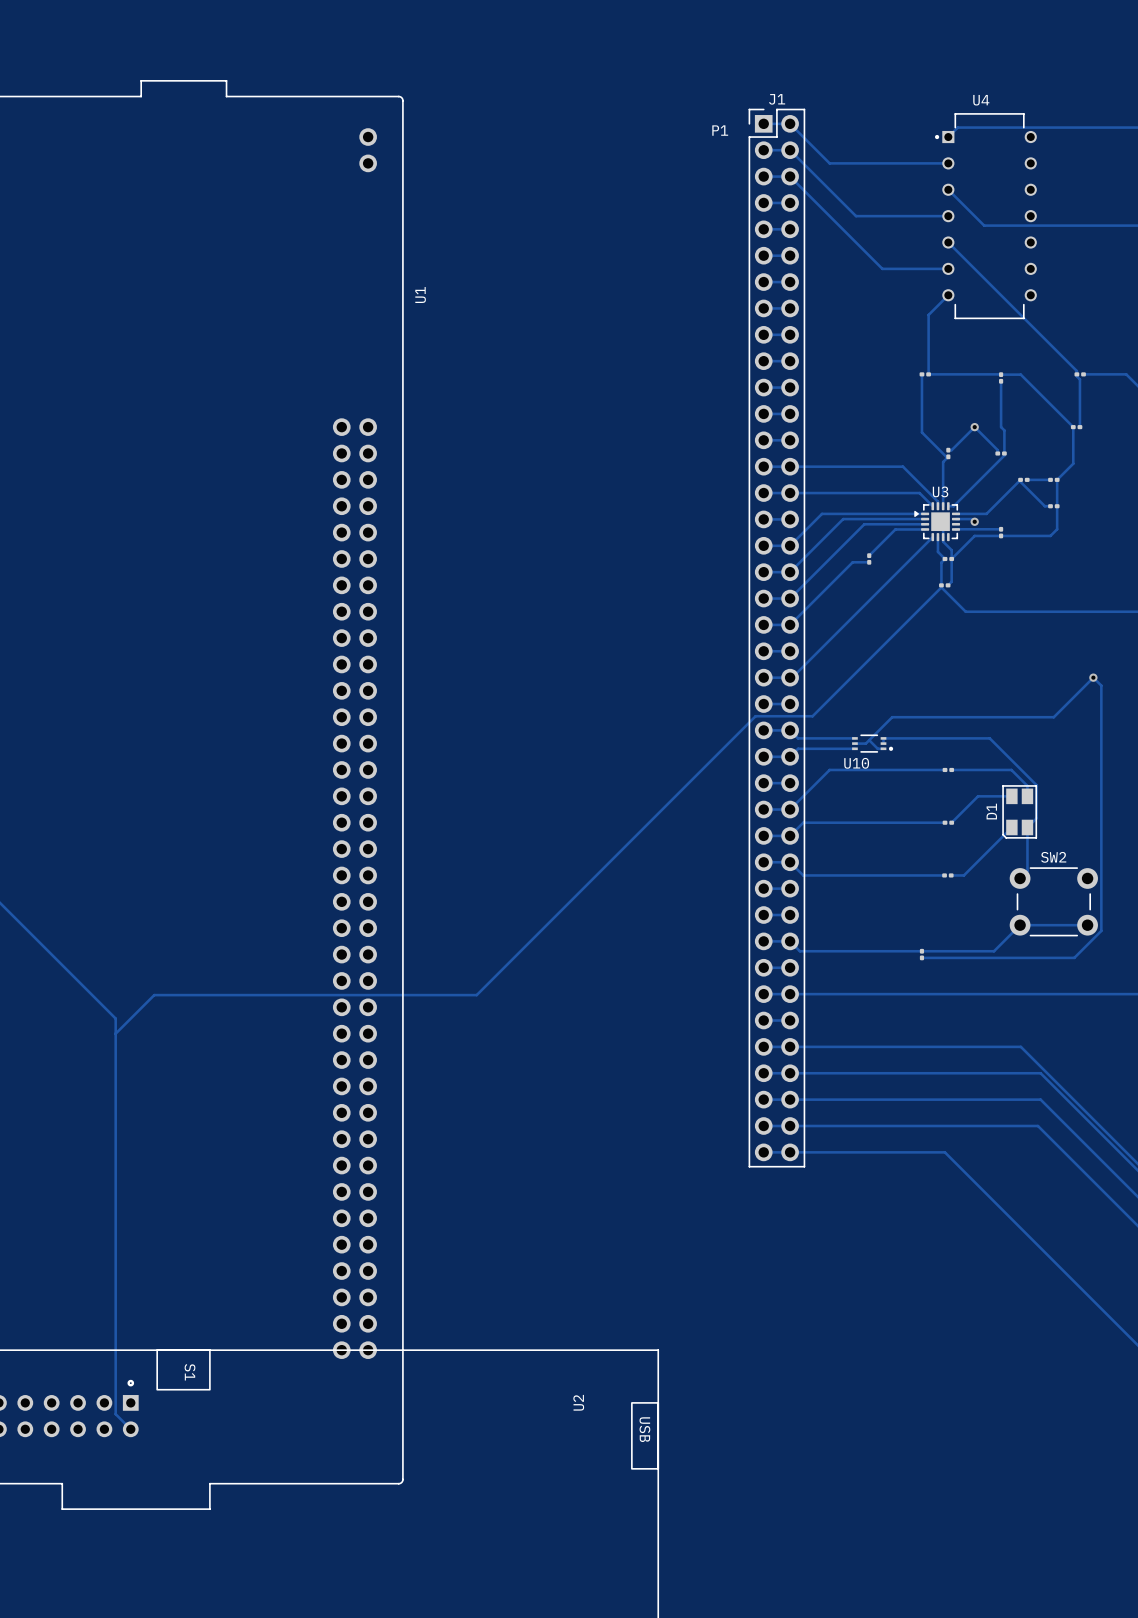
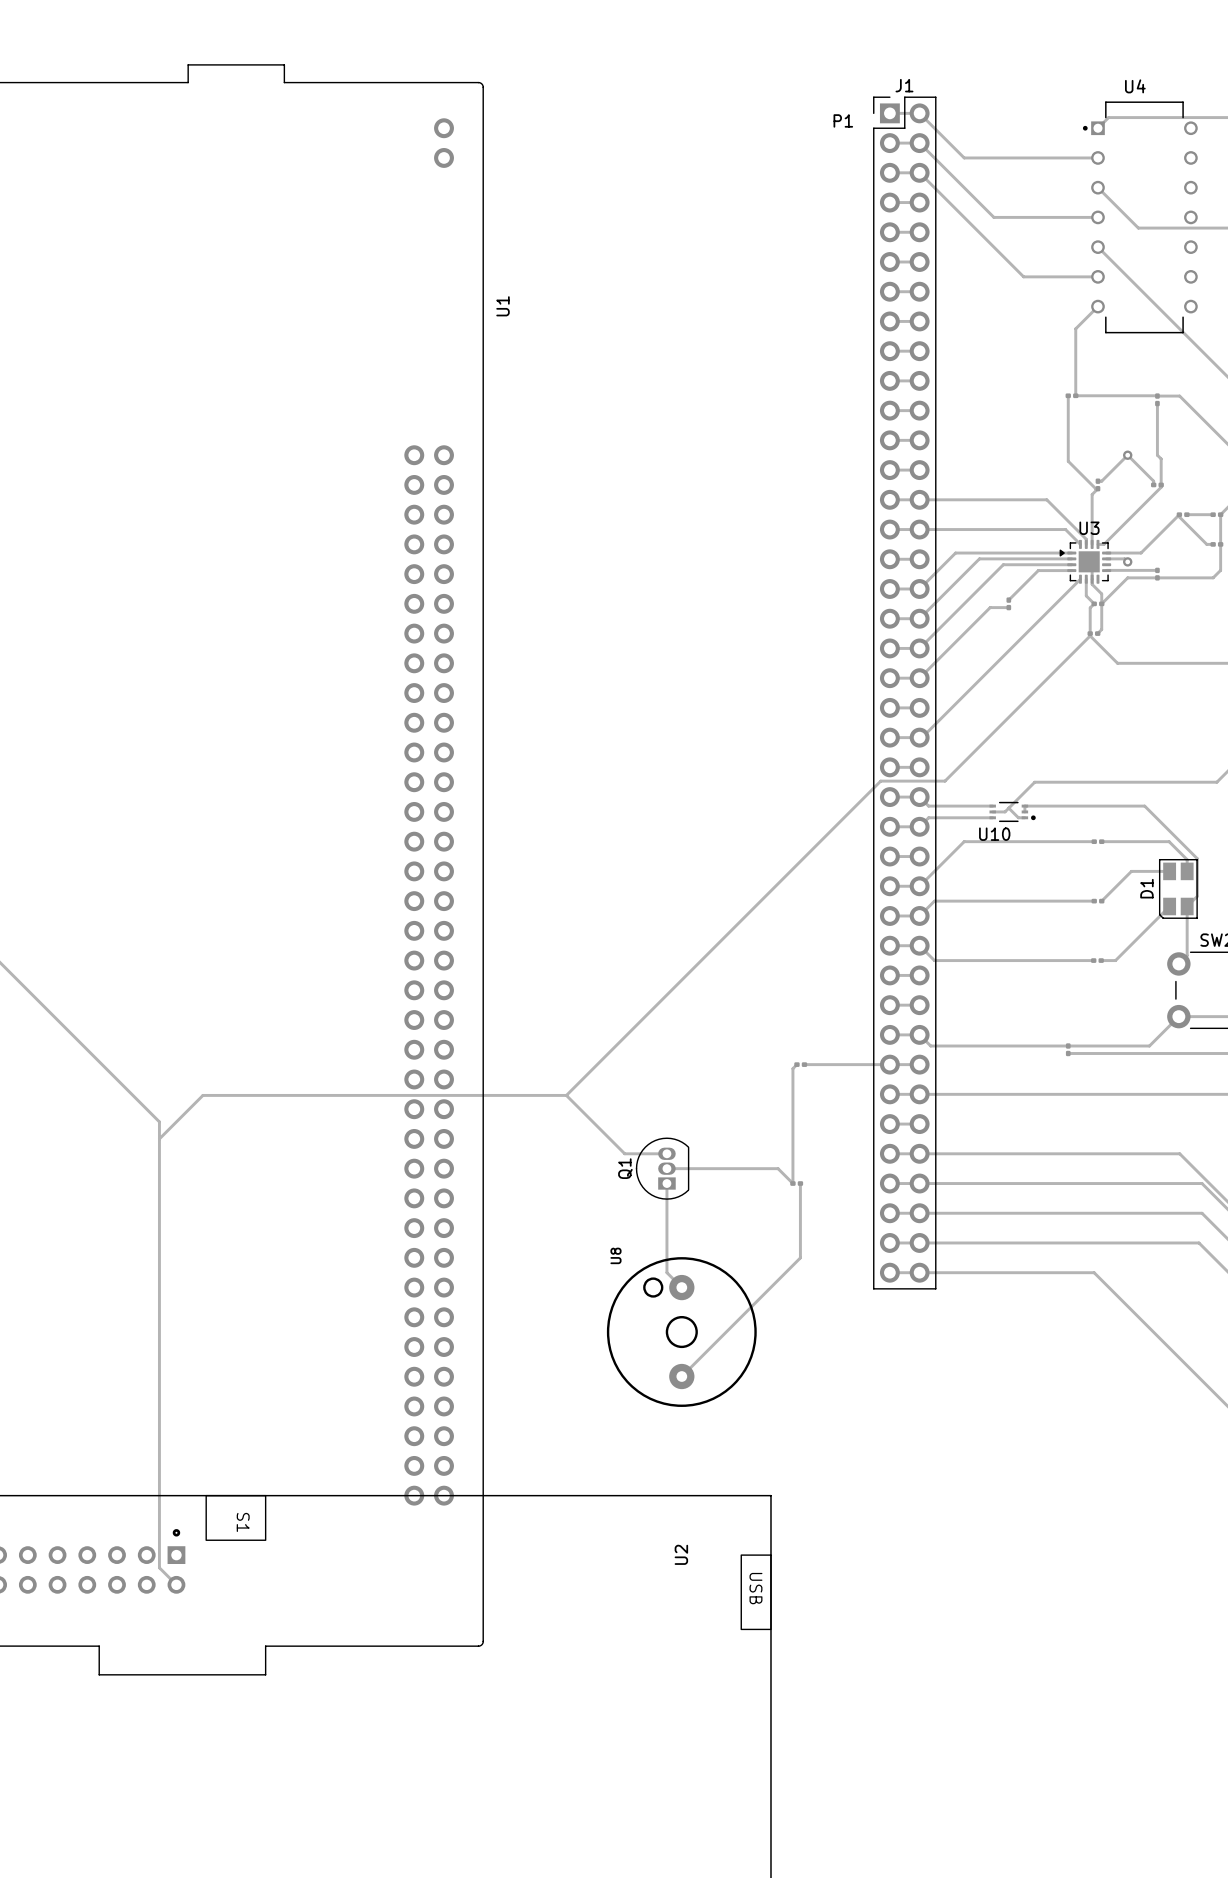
track: none -> (796, 1064) (792, 1068) (792, 1183) (778, 1168) (666, 1168)
part: none -> (800, 1064)
track: none -> (804, 1064) (889, 1064)
track: none -> (566, 1095) (624, 1153) (666, 1153)
Q1: none -> (662, 1168)
track: none -> (666, 1183) (666, 1272) (681, 1287)
part: none -> (796, 1183)
track: none -> (800, 1183) (800, 1257) (681, 1376)
U8: none -> (681, 1332)

